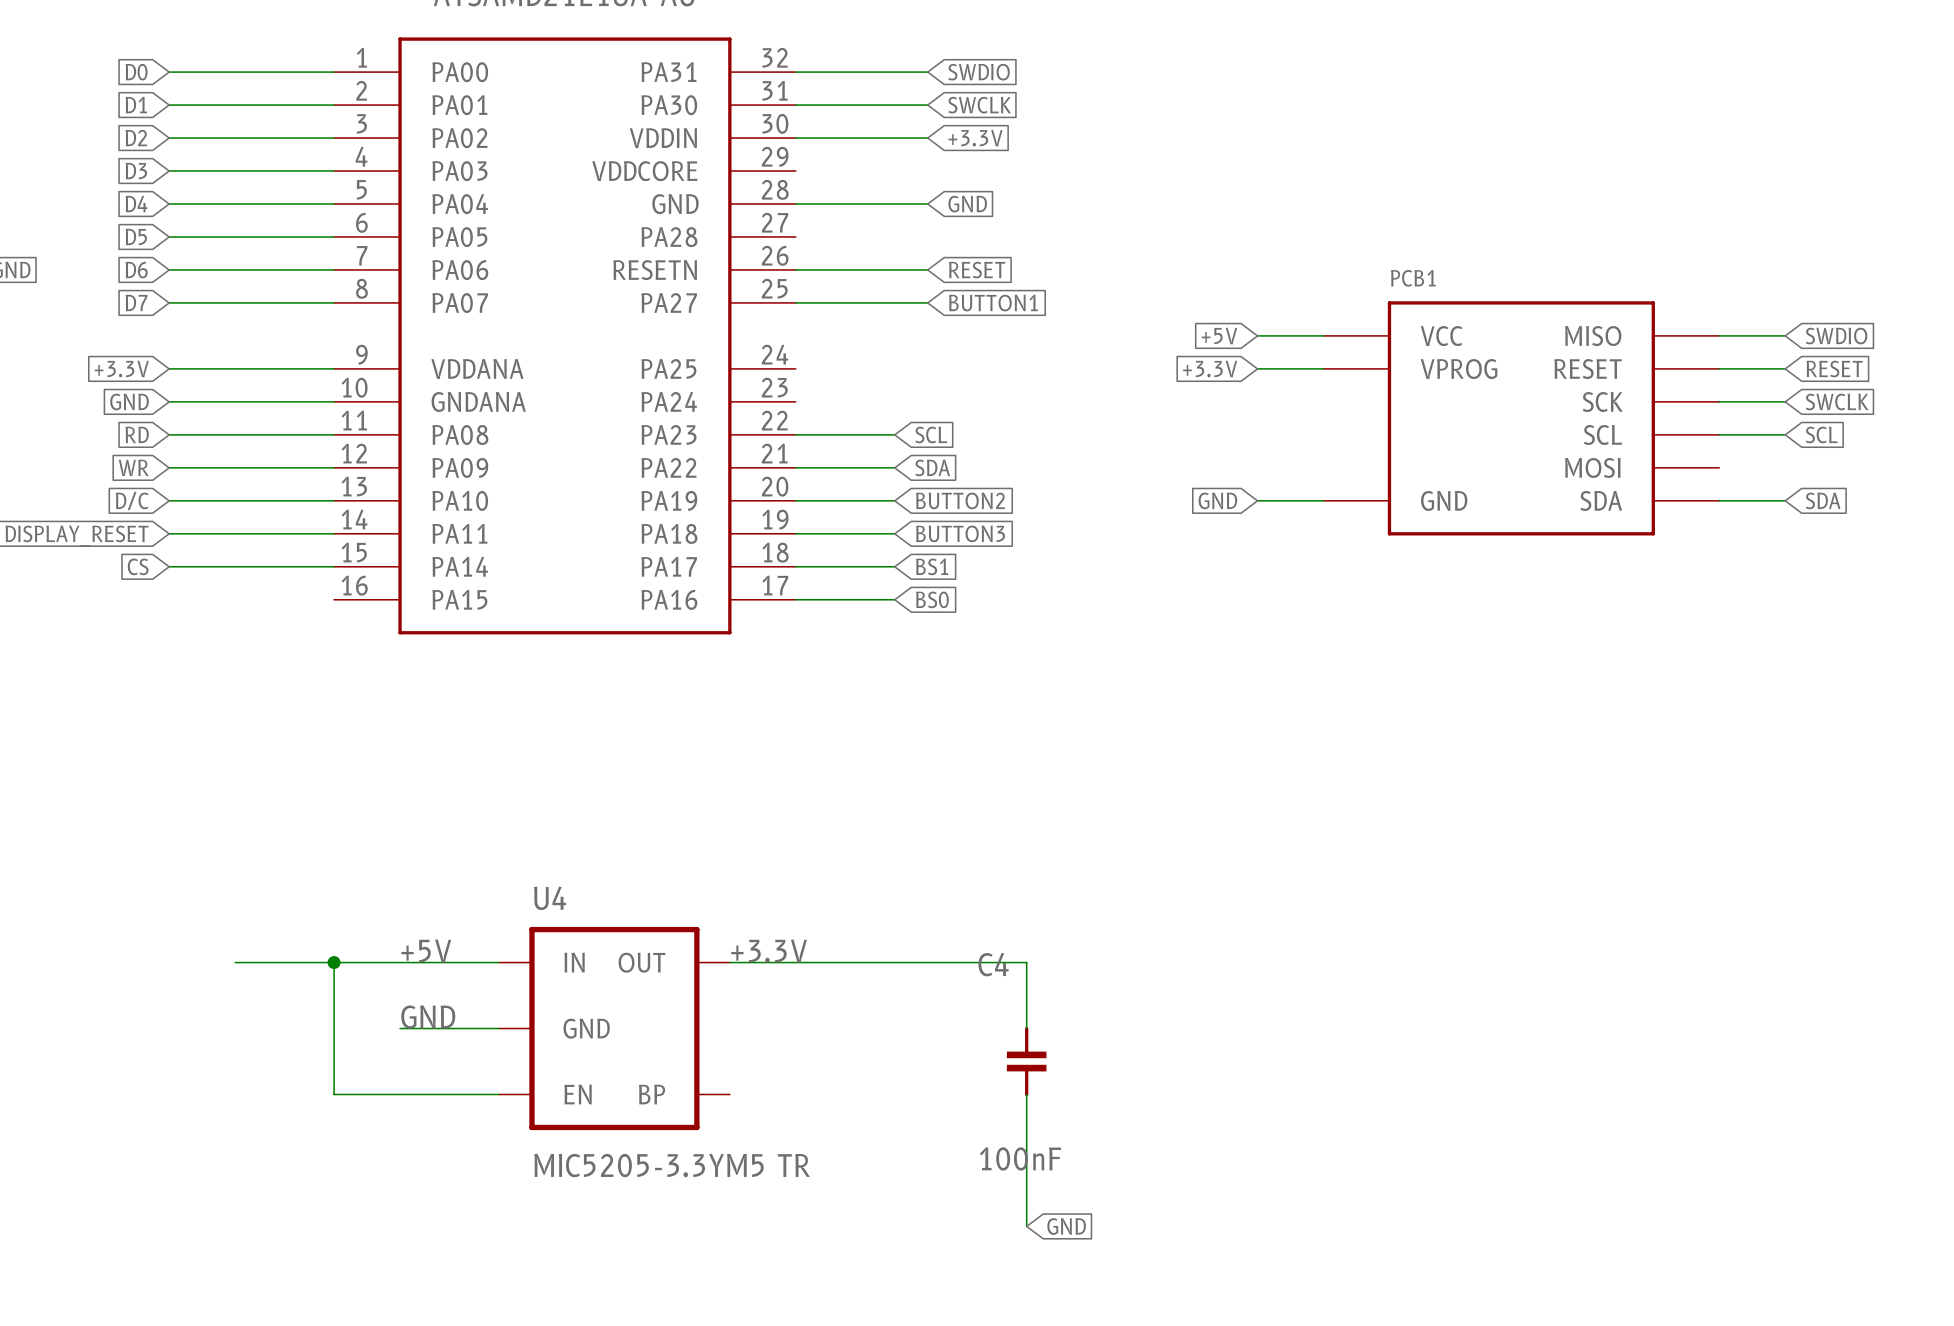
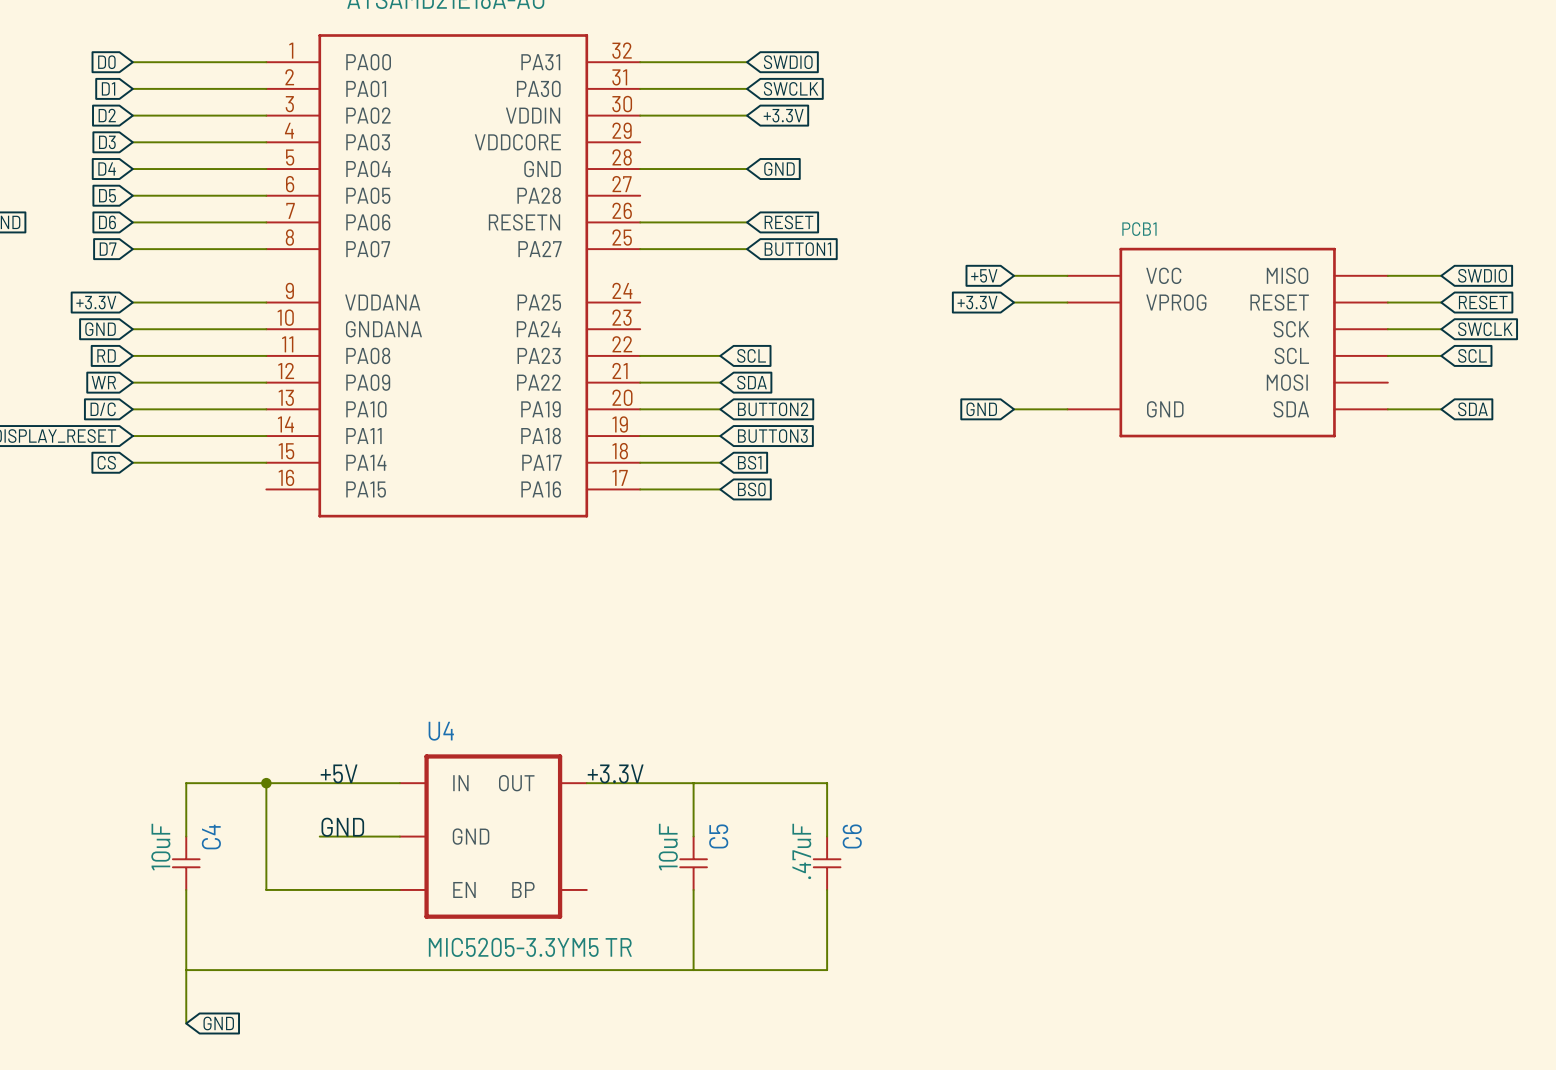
wire: none -> (186, 783) (186, 836)
wire: none -> (693, 783) (693, 836)
C4 name position: C4 (993, 964) -> C4 (211, 837)
C4 symbol: [1006, 1026, 1047, 1097] -> [172, 835, 201, 891]
C5: none -> 10uF (693, 863)
C6: none -> .47uF (827, 863)
wire: none -> (186, 889) (186, 1023)
wire: none -> (693, 889) (693, 970)
C4 value: 100nF (1020, 1158) -> 10uF (160, 847)
wire: (1026, 1193) (1026, 1226) -> (827, 970) (186, 970)
global label: GND (1066, 1226) -> none
global label: none -> GND (218, 1023)

